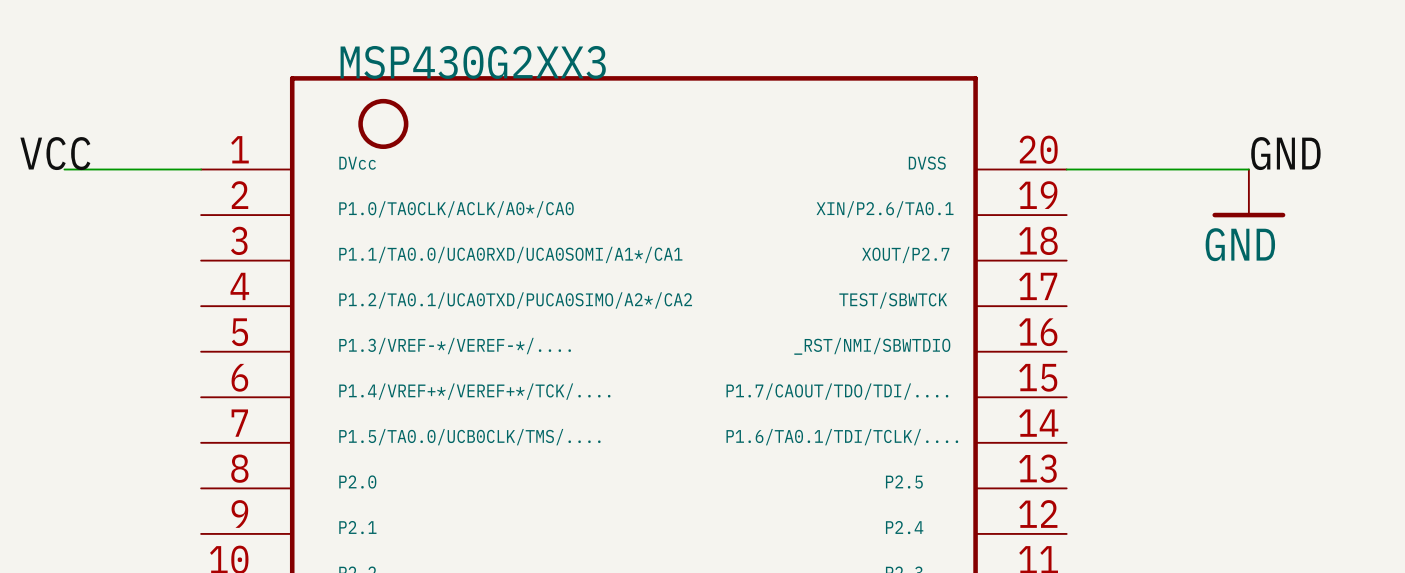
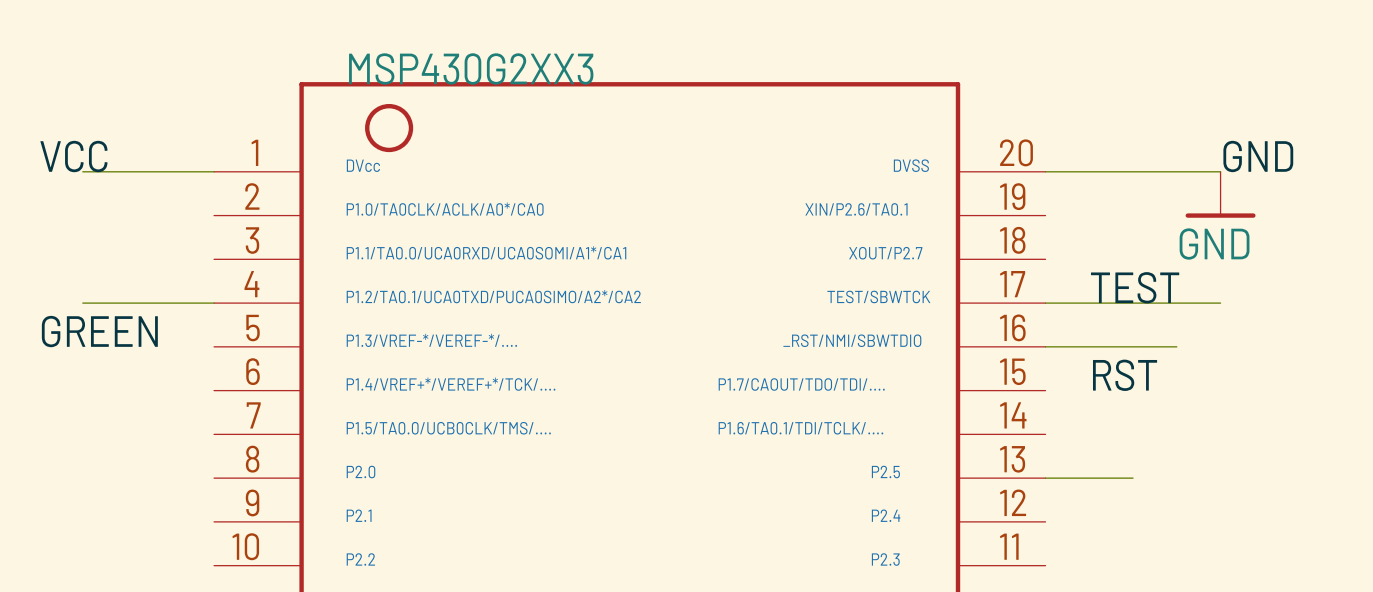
label: none -> TEST (1135, 287)
wire: none -> (82, 303) (214, 303)
wire: none -> (1045, 303) (1220, 303)
label: none -> GREEN (99, 331)
wire: none -> (1045, 346) (1176, 346)
label: none -> RST (1125, 375)
wire: none -> (1045, 478) (1133, 478)

